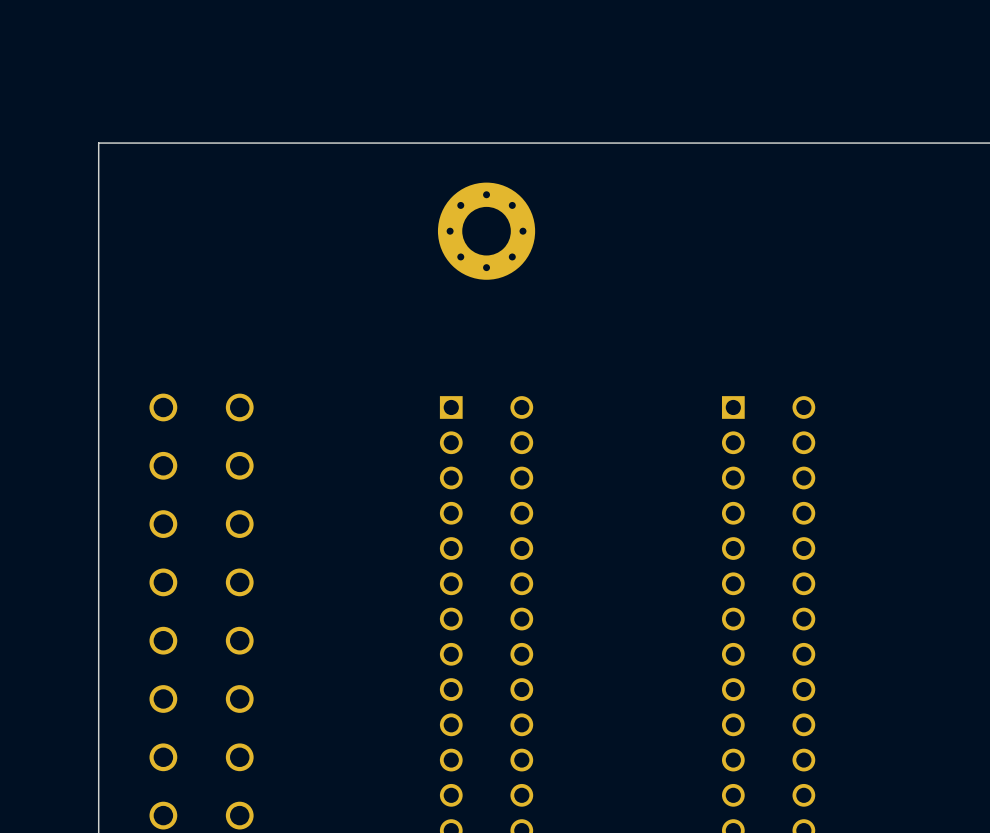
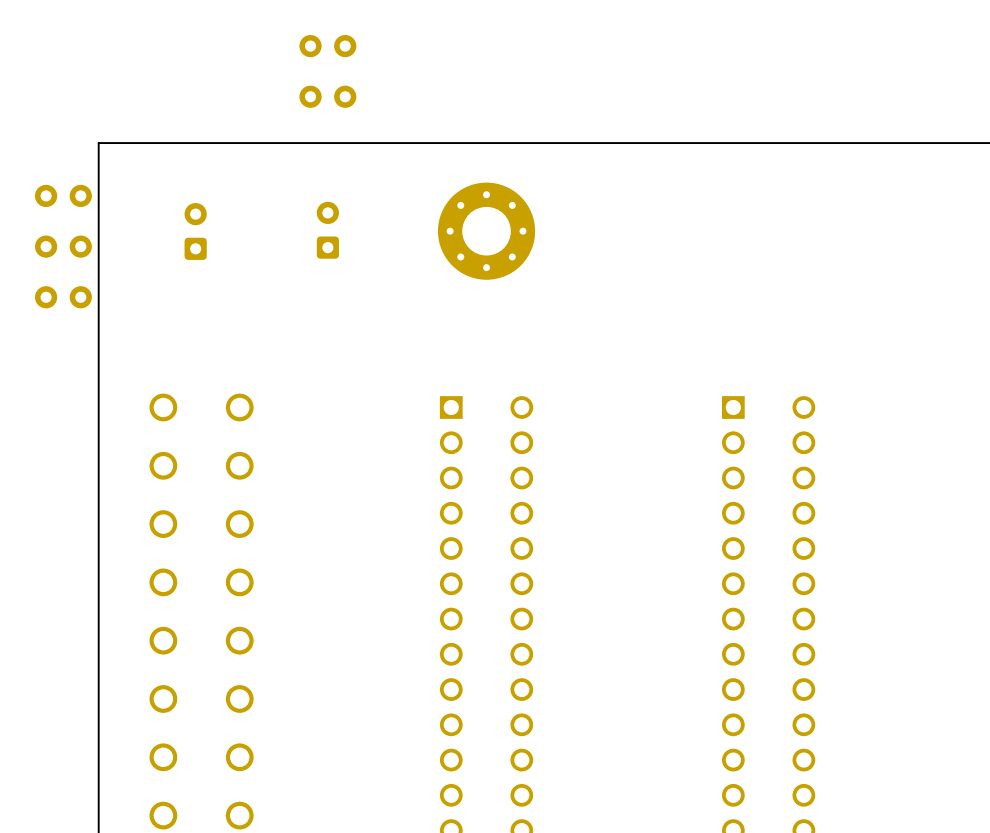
part: none -> (327, 46)
part: none -> (327, 96)
part: none -> (63, 195)
part: none -> (327, 230)
part: none -> (195, 231)
part: none -> (63, 246)
part: none -> (63, 297)

